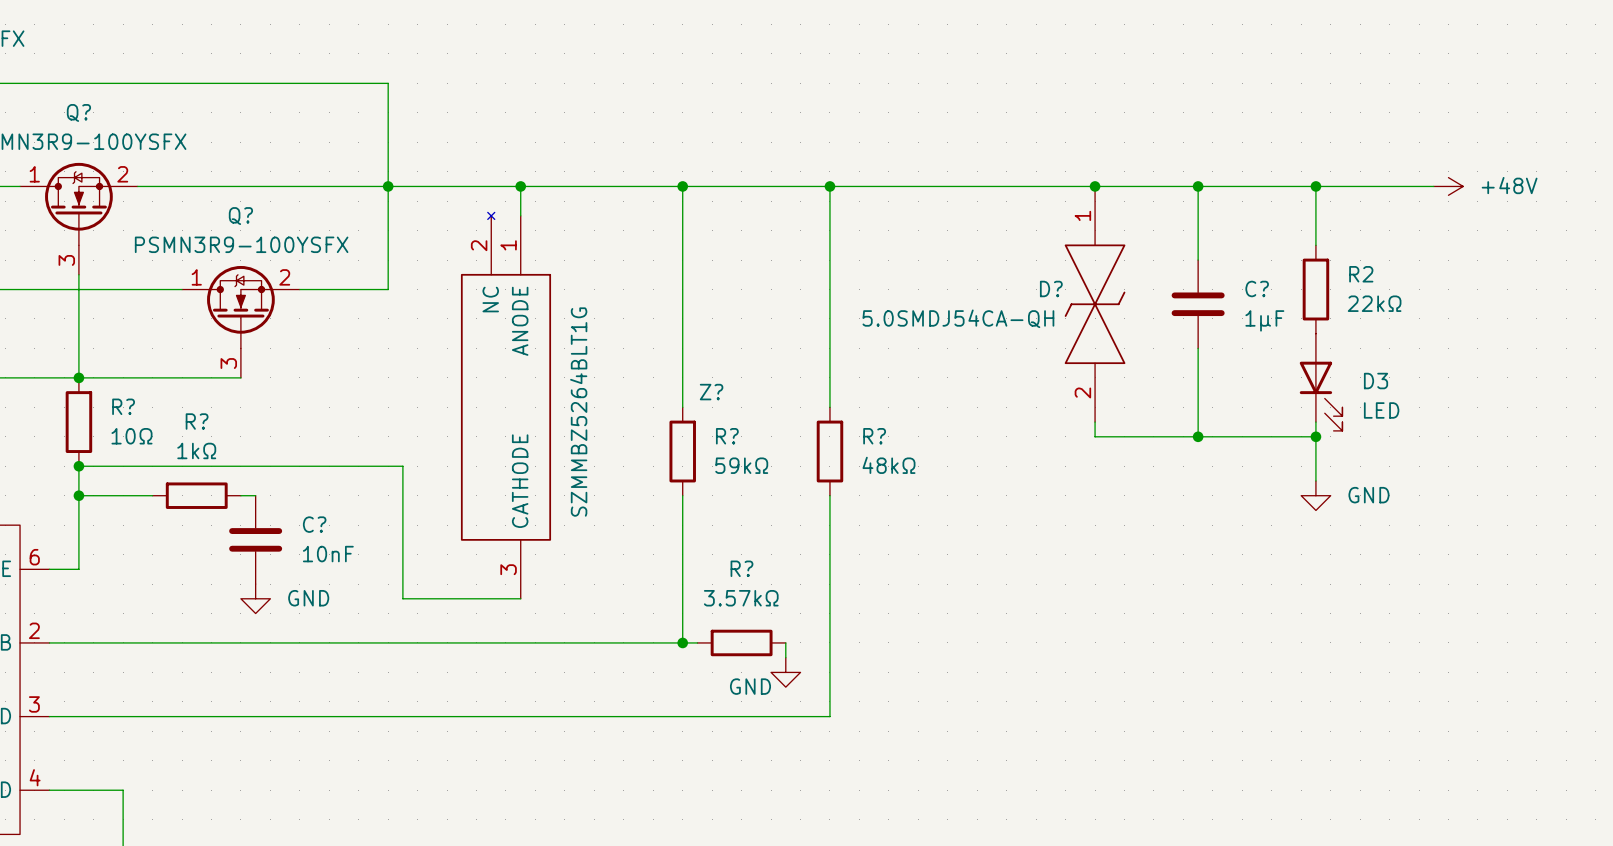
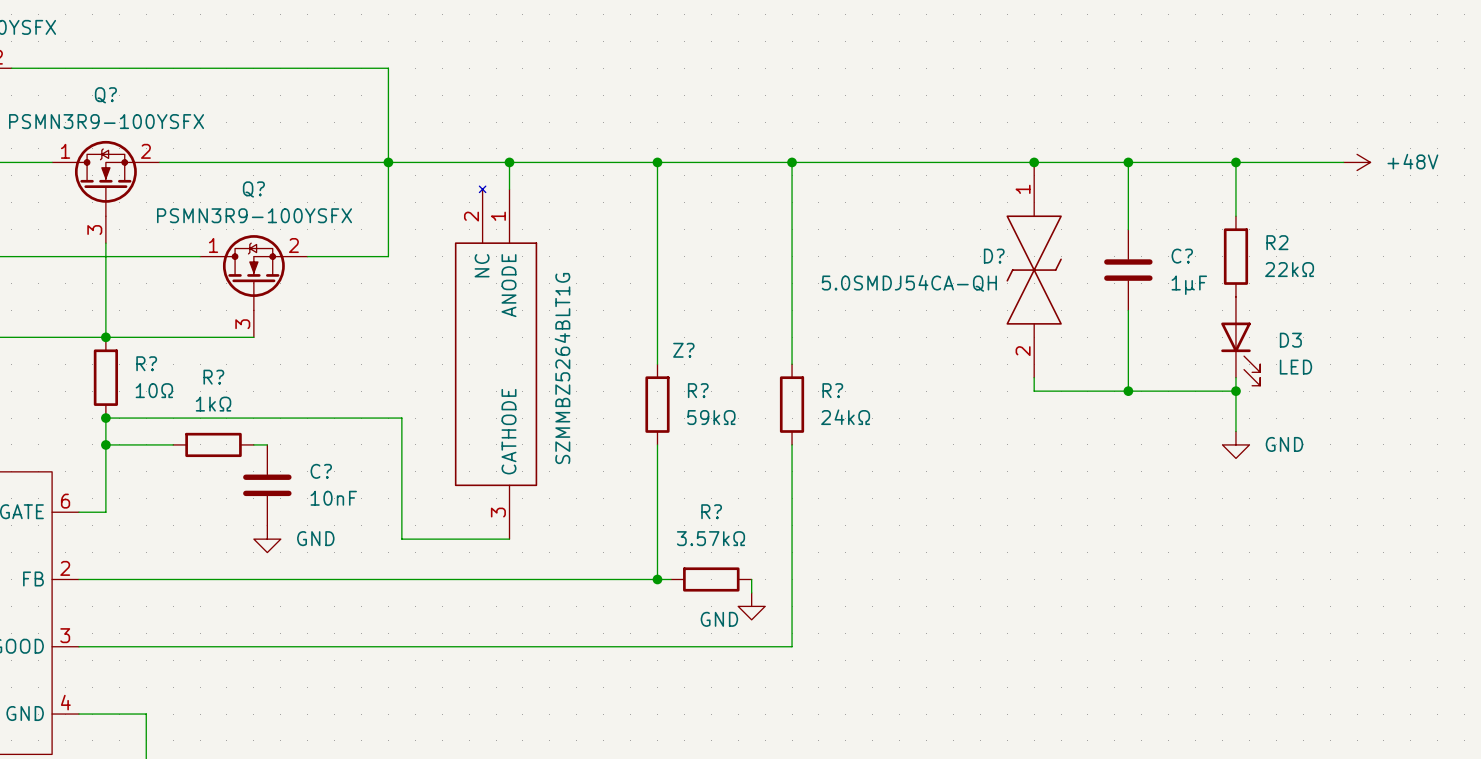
R? value: 48kΩ (888, 465) -> 24kΩ (845, 417)

